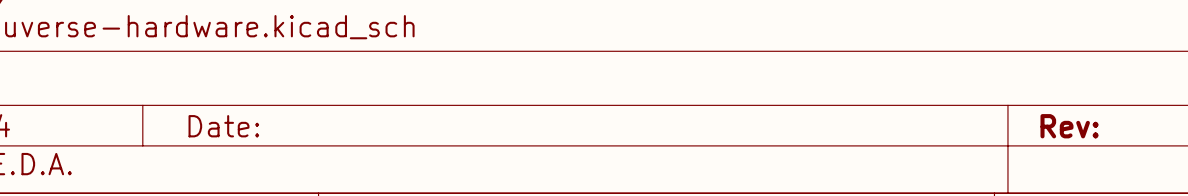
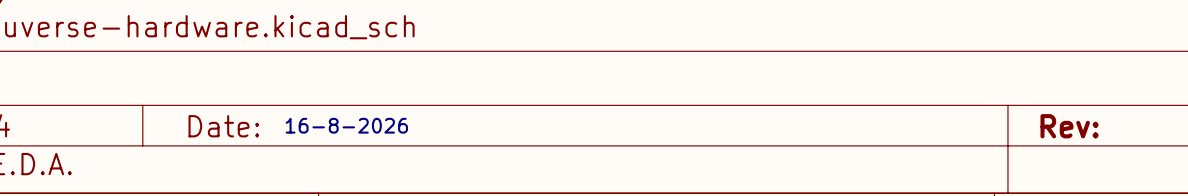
text: none -> 16-8-2026 (346, 125)

